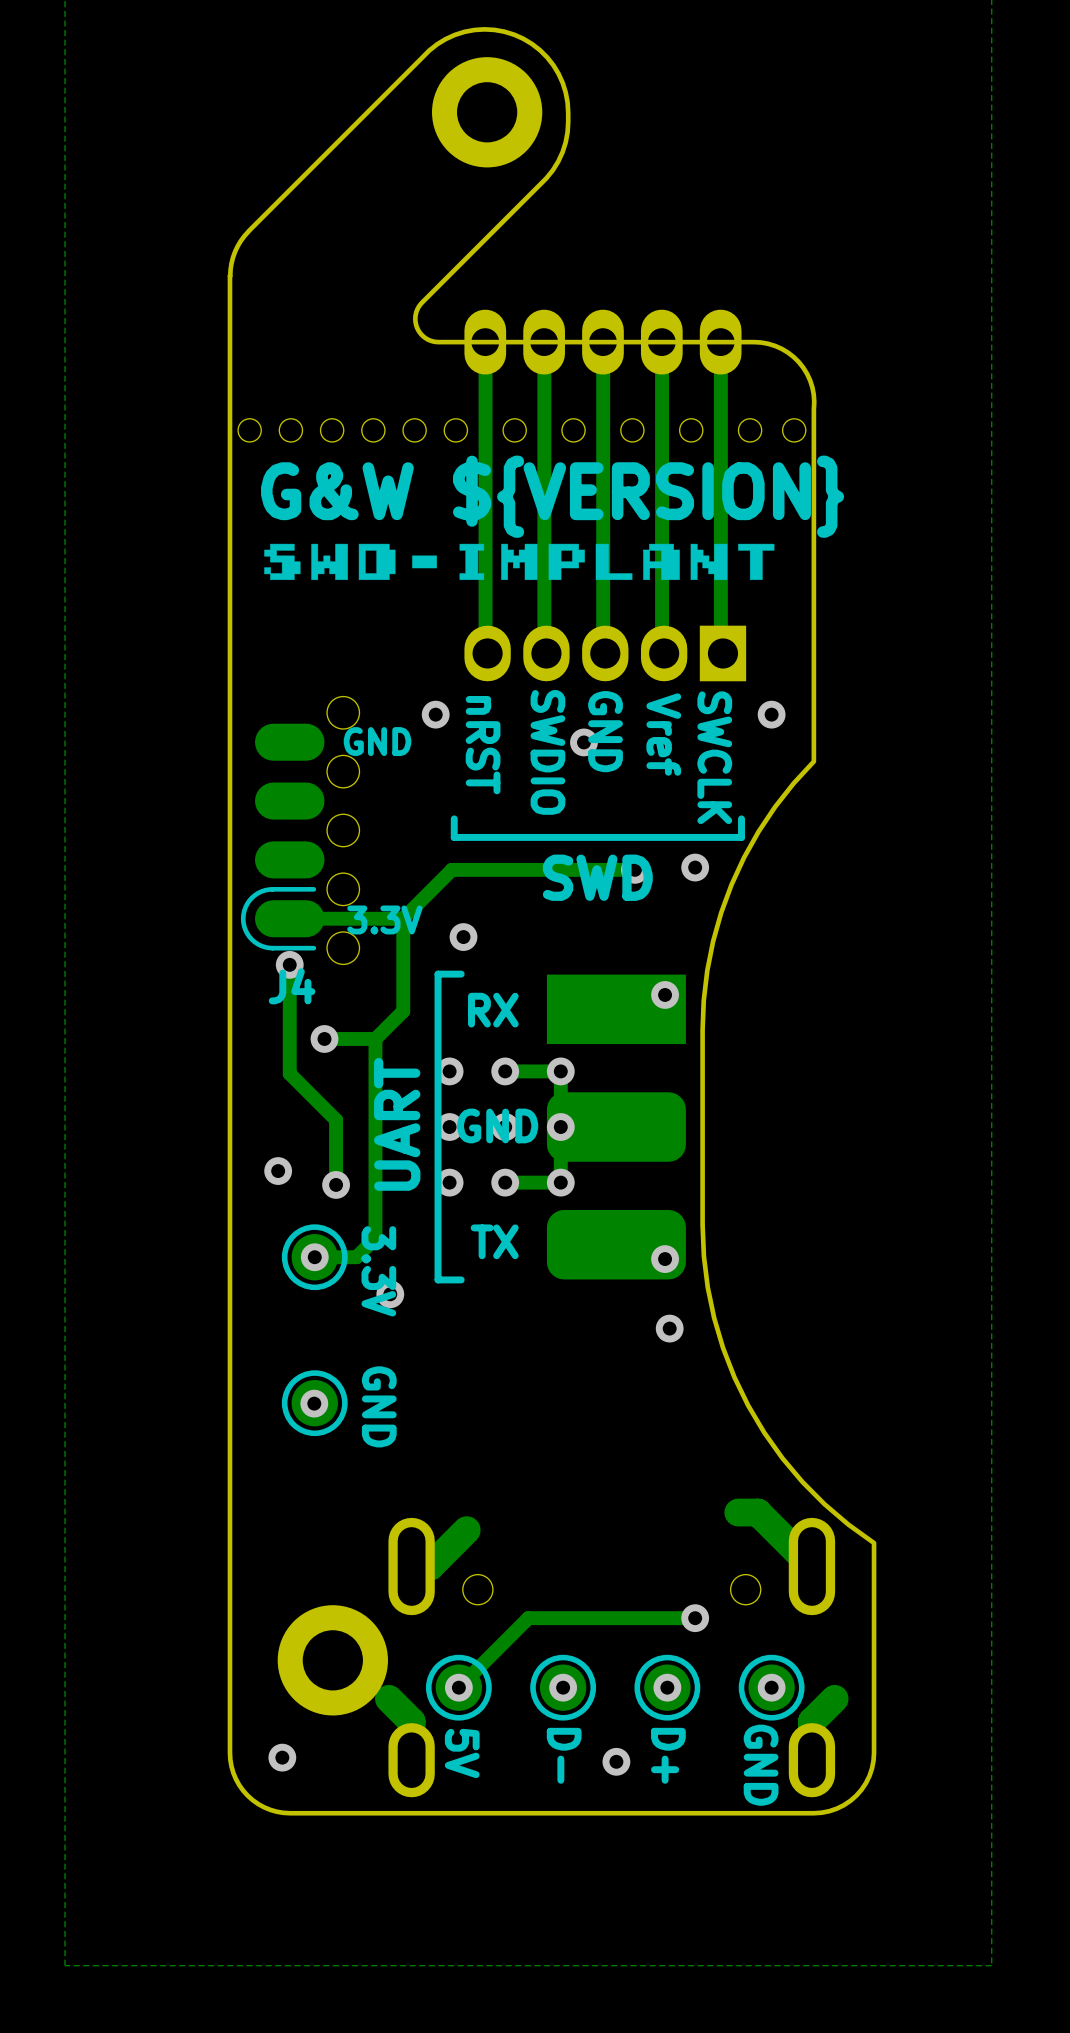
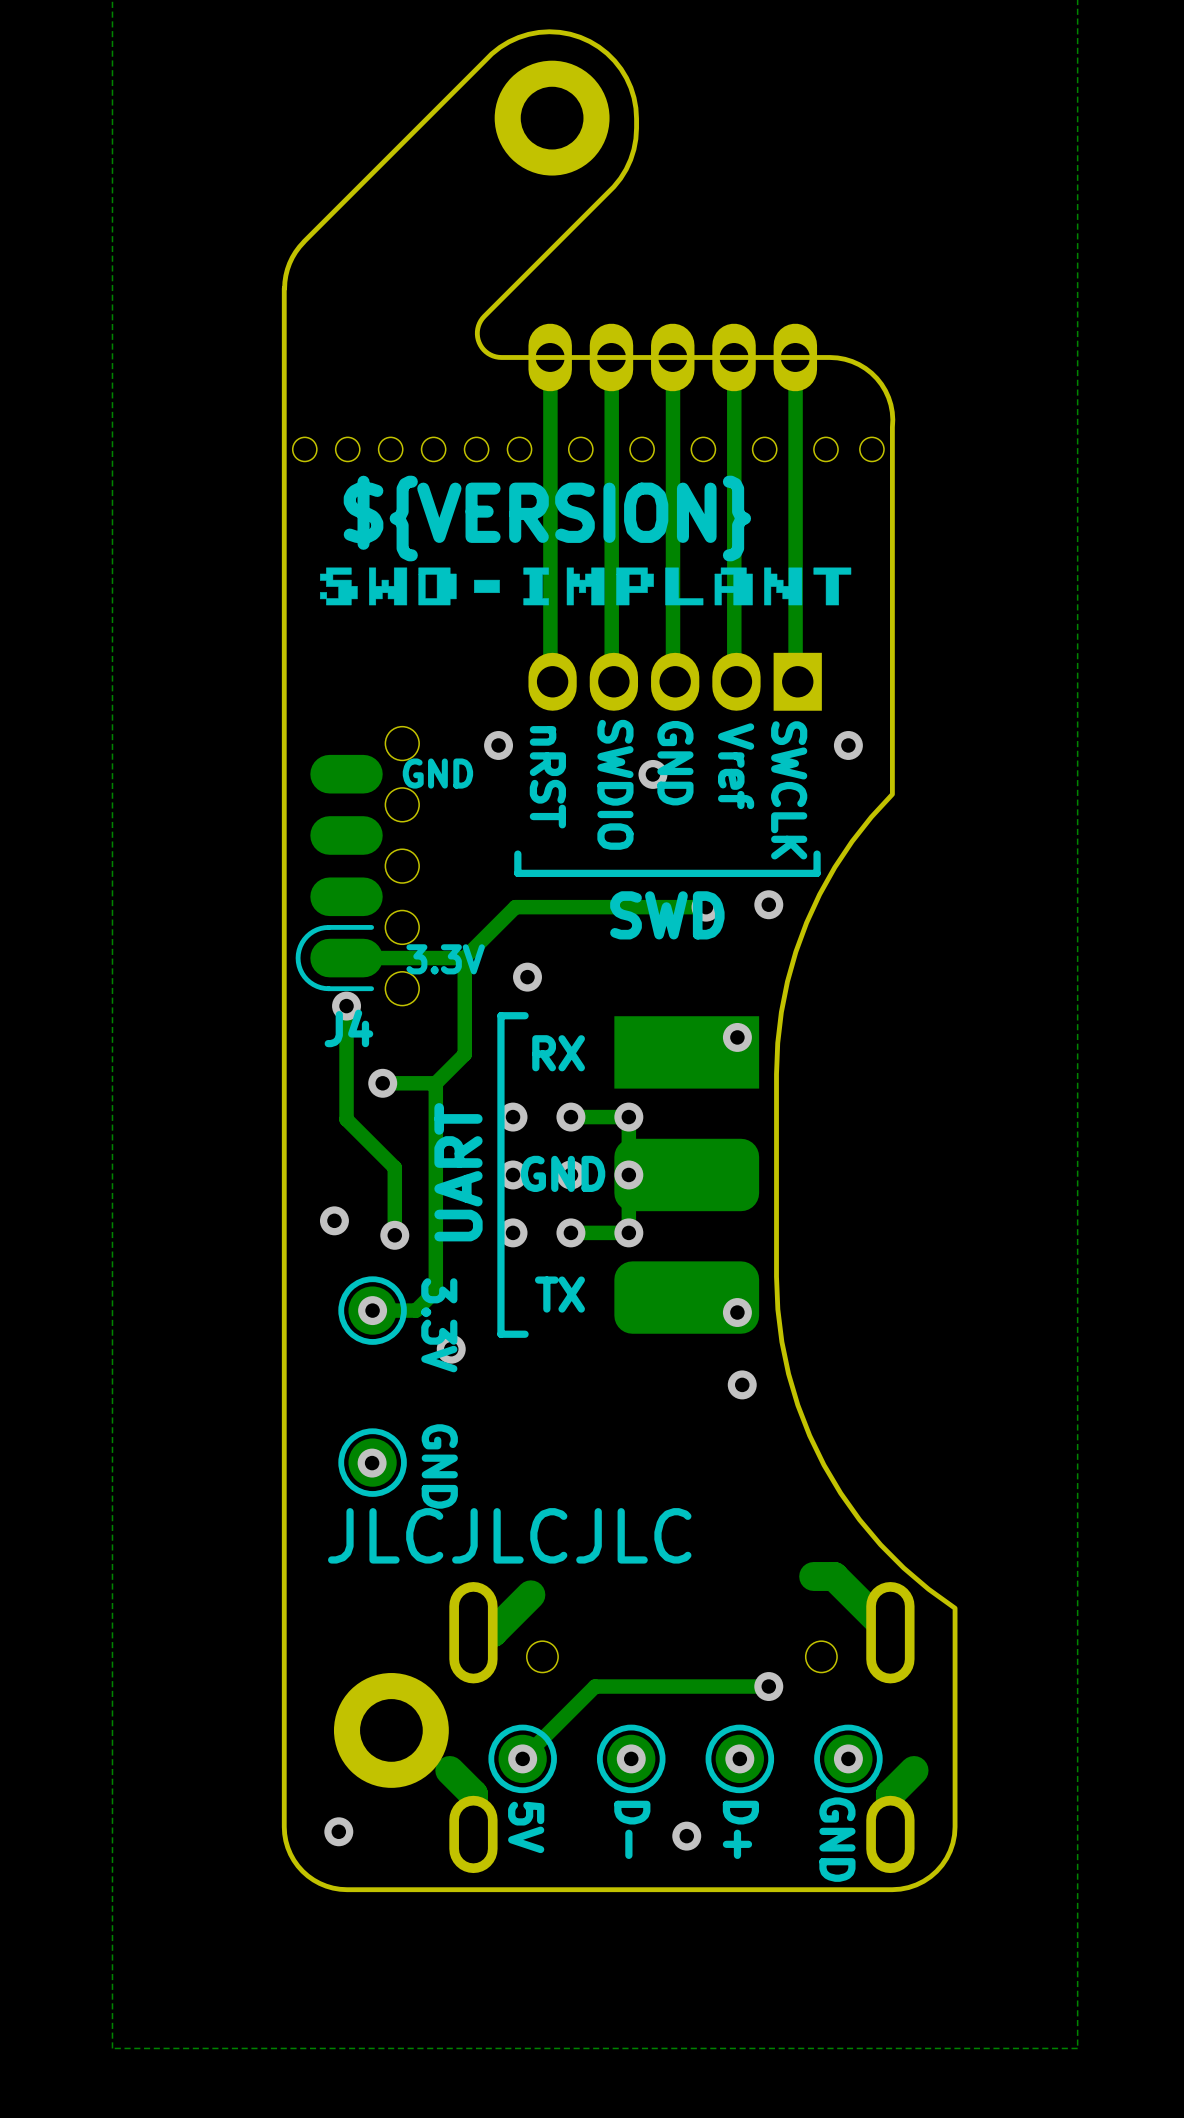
text: G&W ${VERSION} (552, 496) -> ${VERSION} (547, 518)
text: none -> JLCJLCJLC (509, 1535)

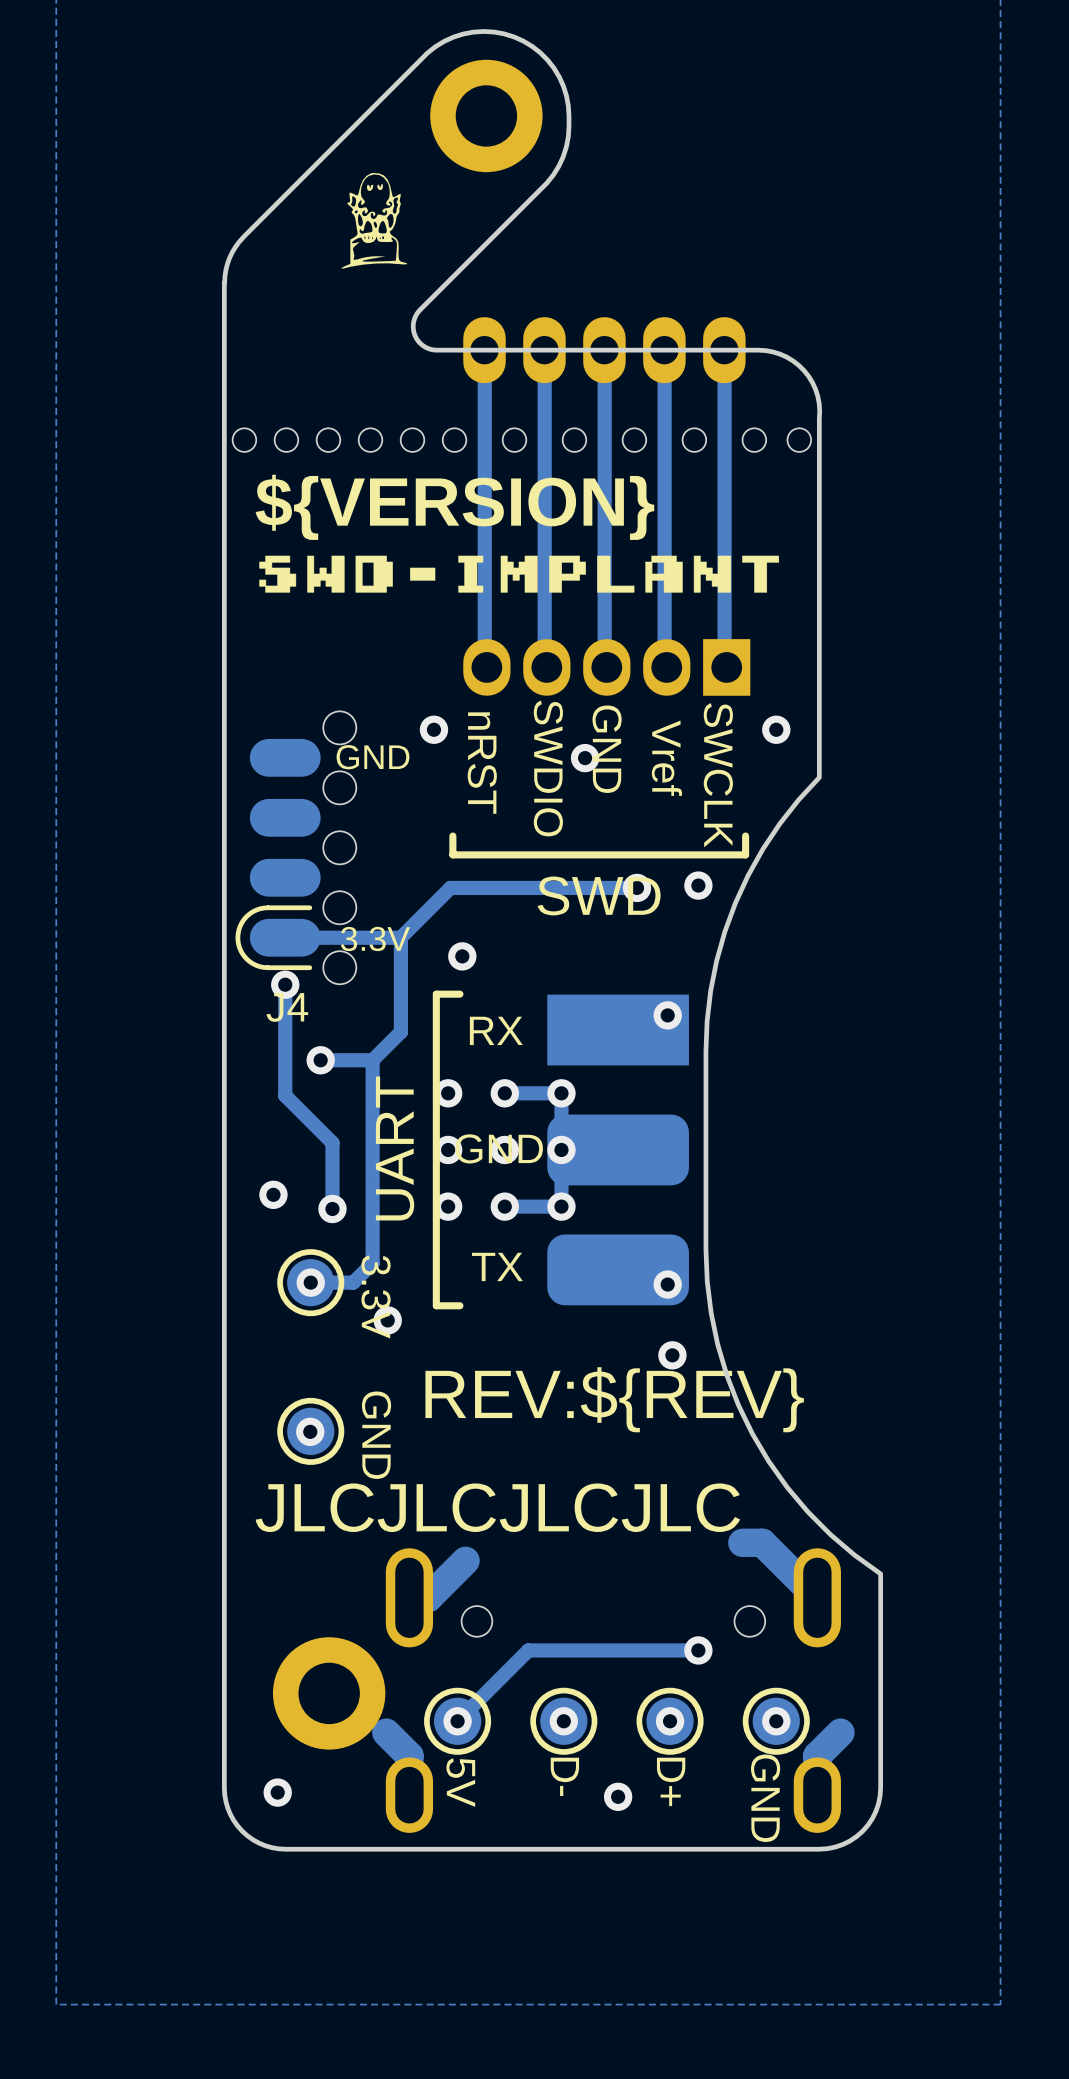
drawing: none -> [341, 173, 408, 269]
text: none -> REV:${REV} (614, 1399)
text: JLCJLCJLC (509, 1535) -> JLCJLCJLCJLC (497, 1507)

